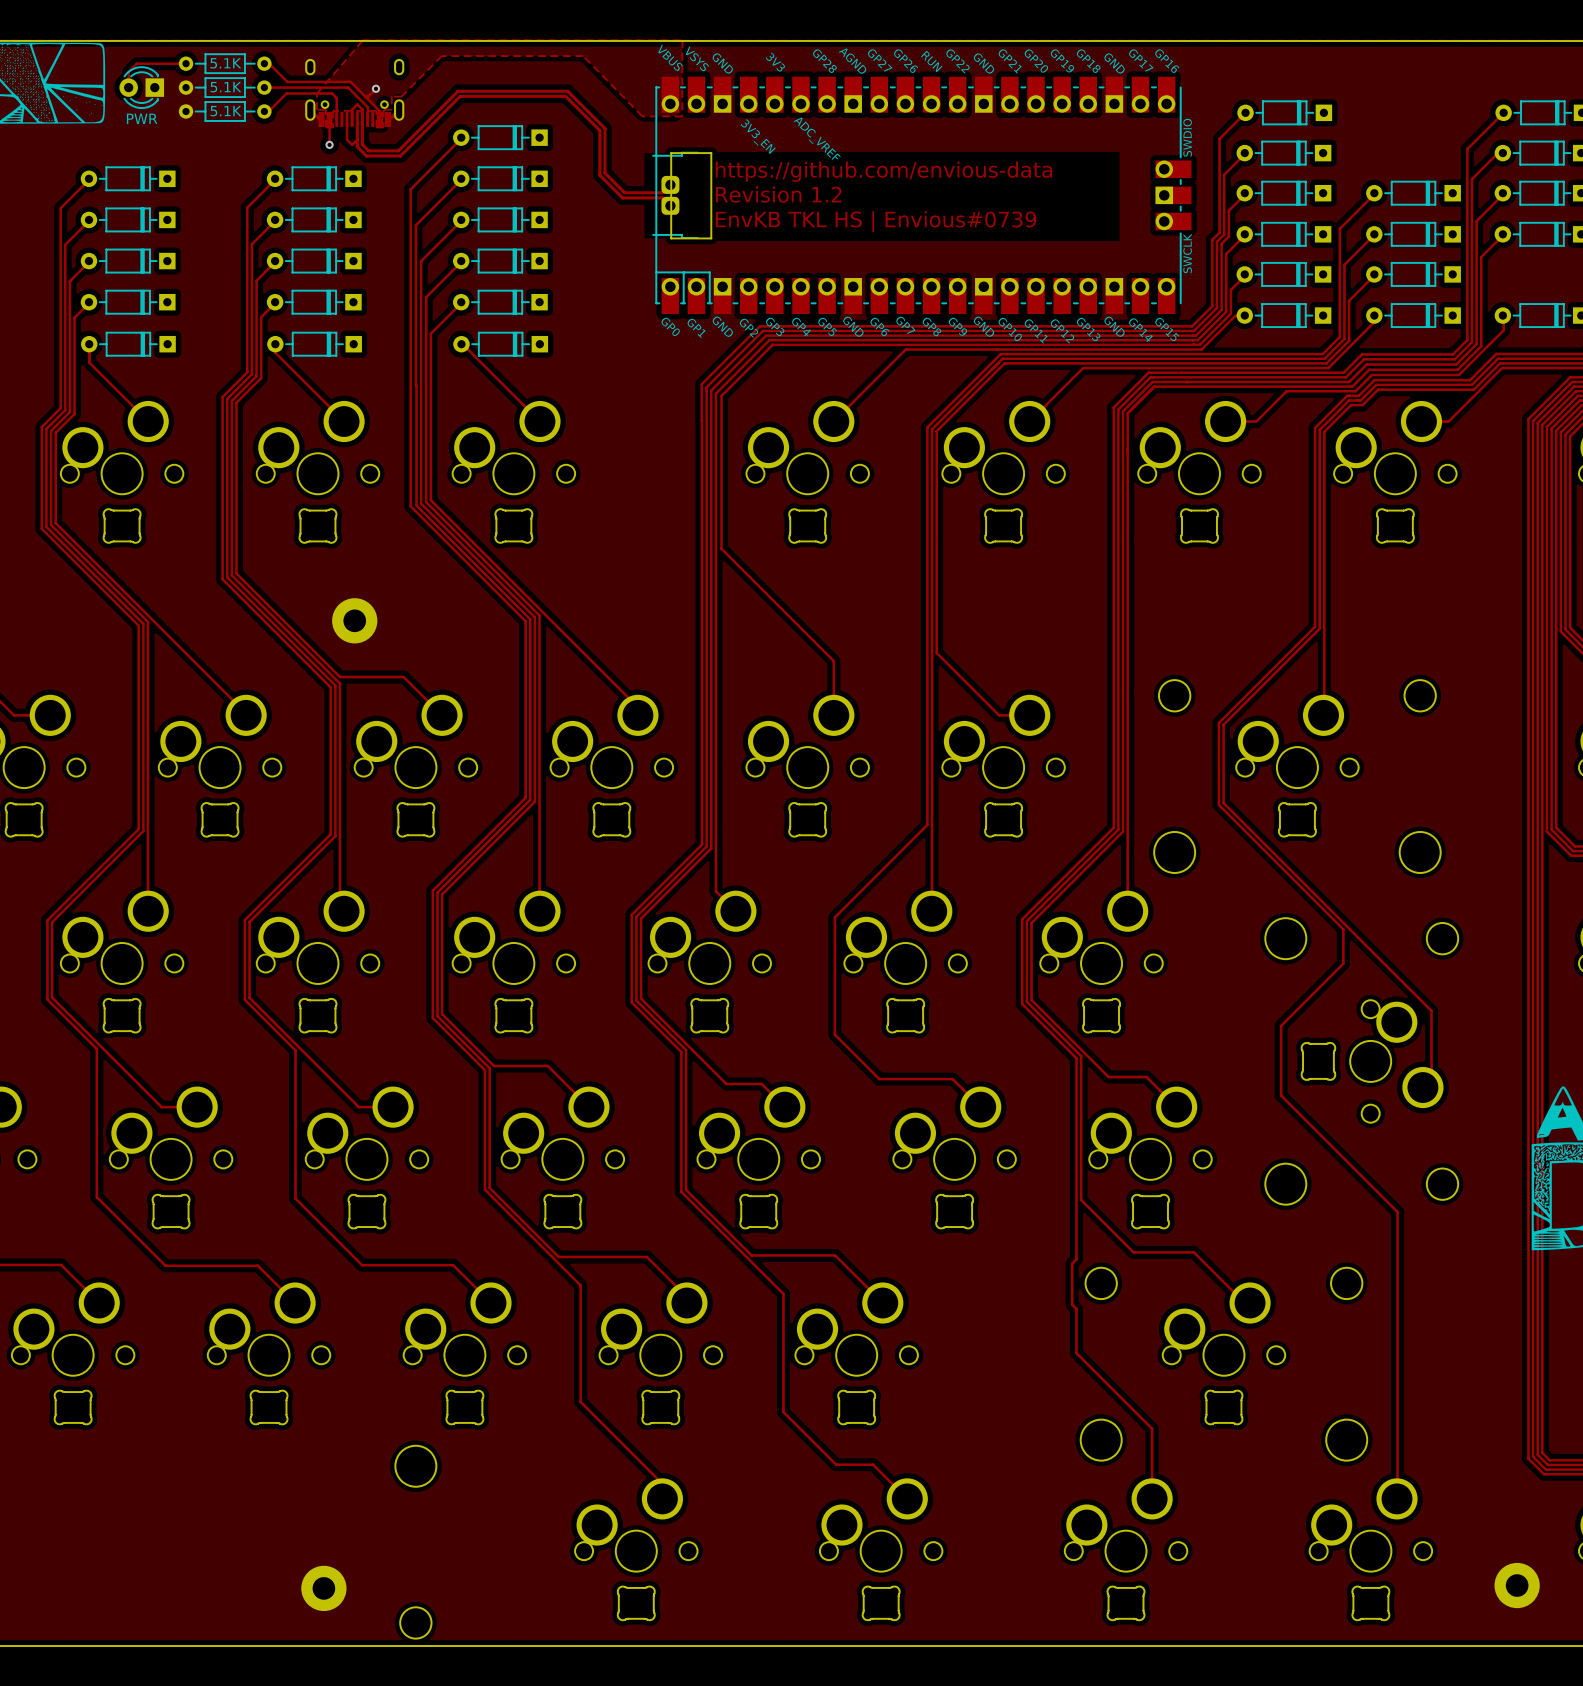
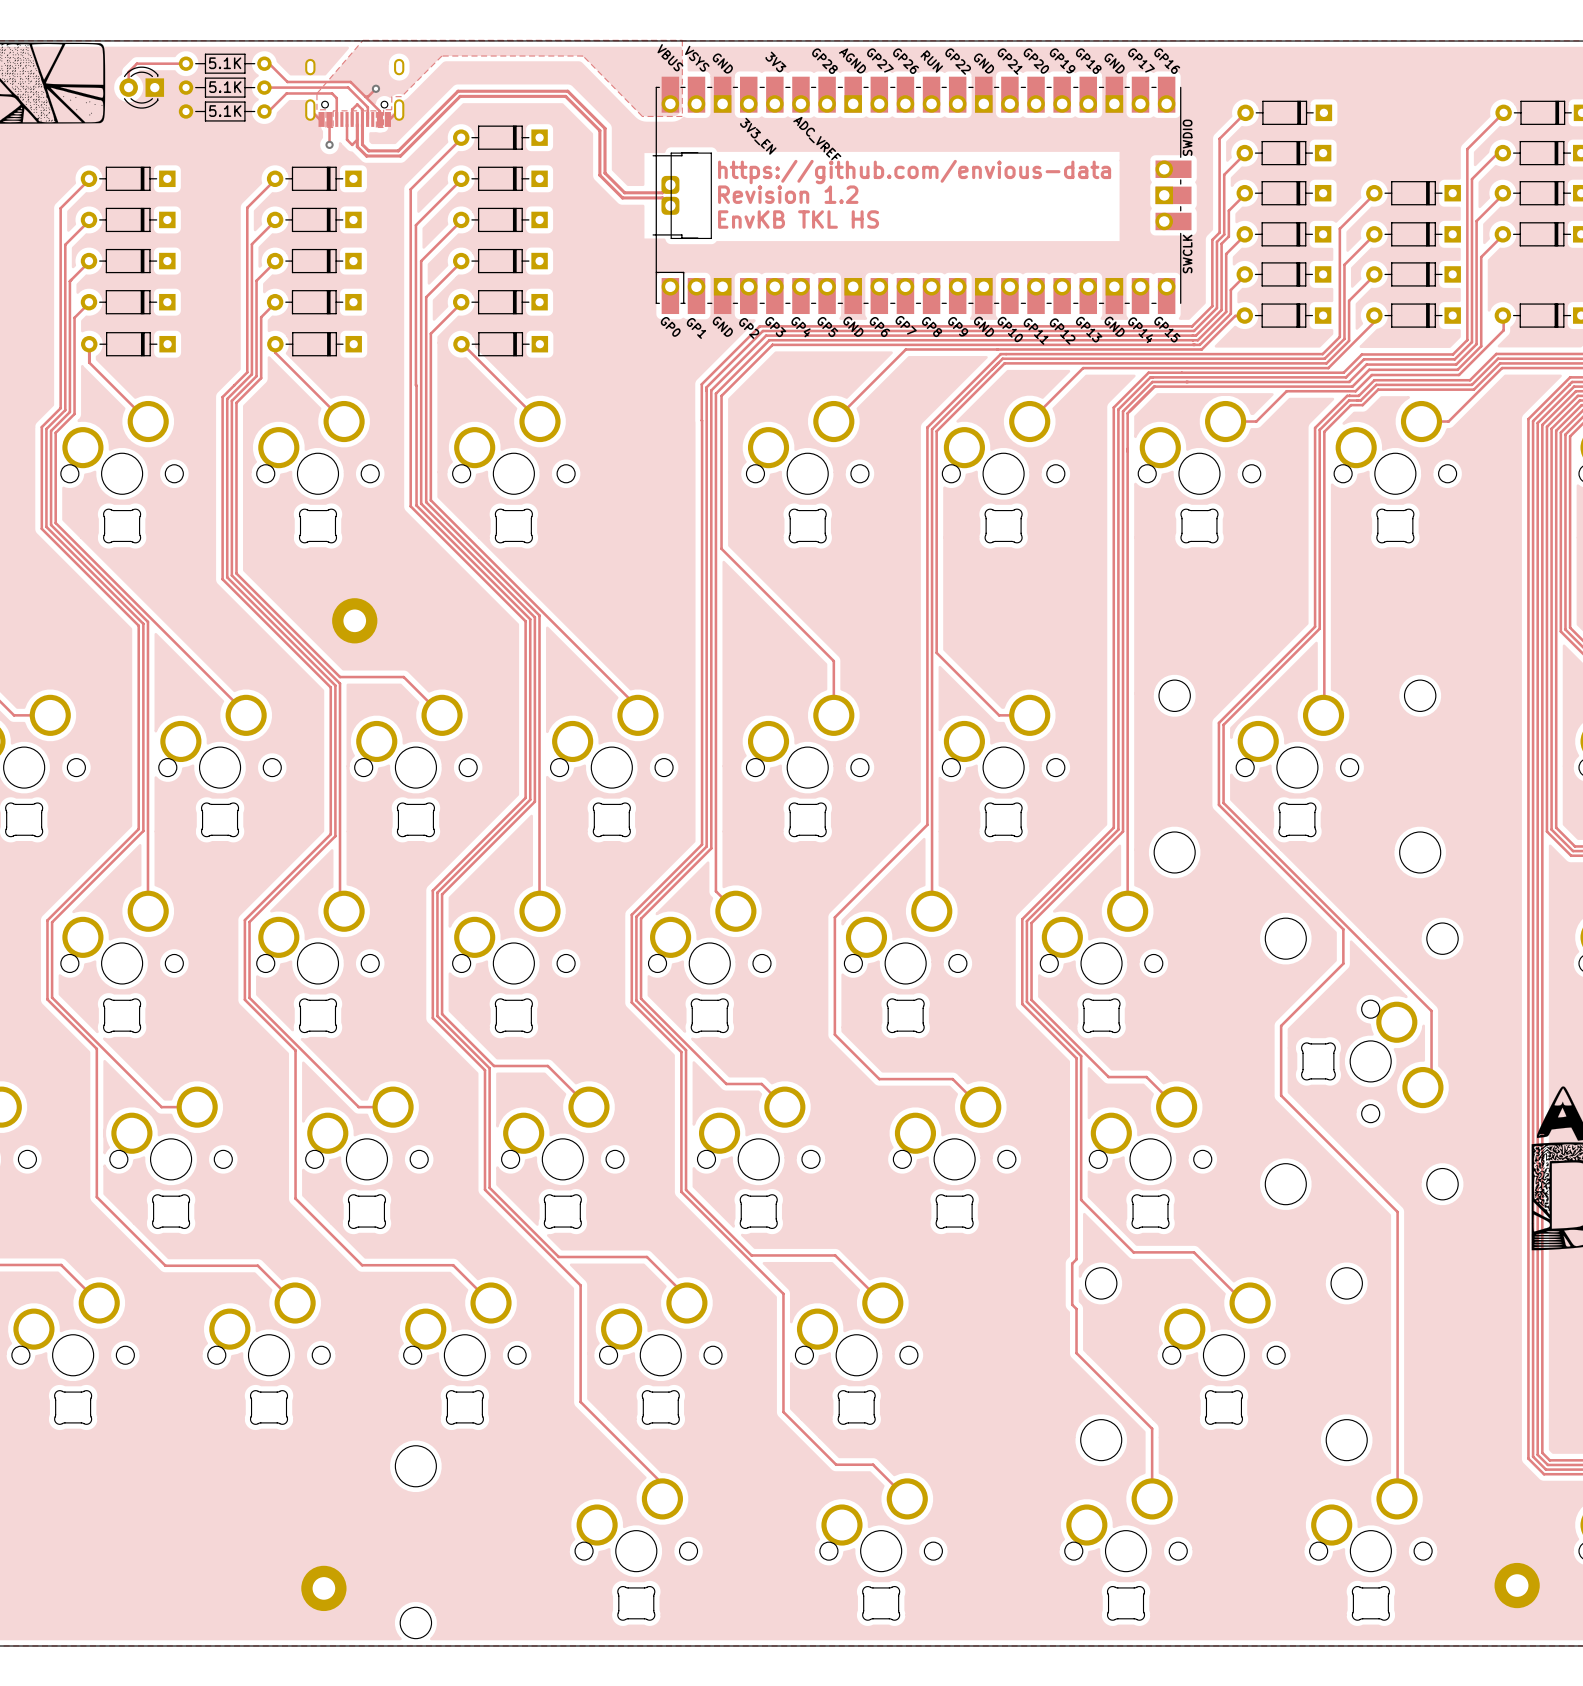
text: PWR (142, 118) -> none
text: EnvKB TKL HS | Envious#0739 (876, 221) -> EnvKB TKL HS (798, 219)
line: (683, 272) (709, 272) (709, 303) -> none

